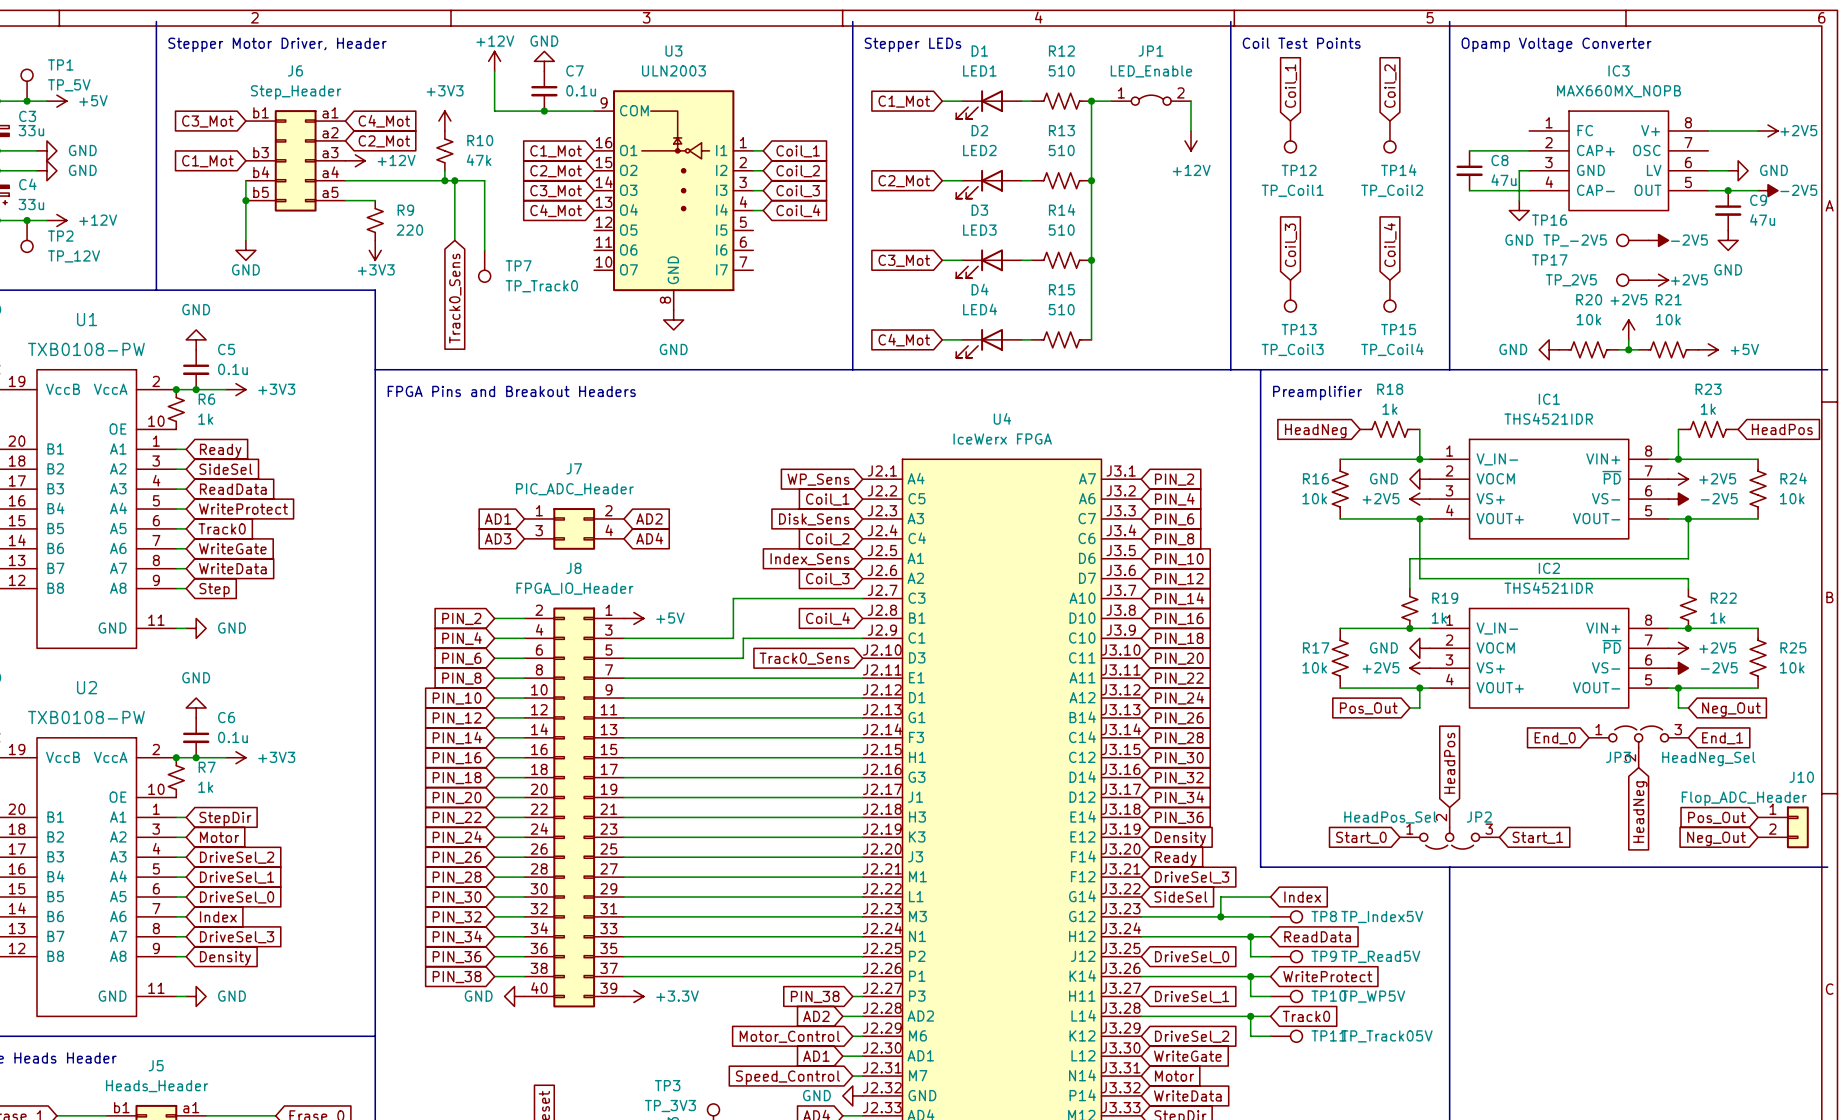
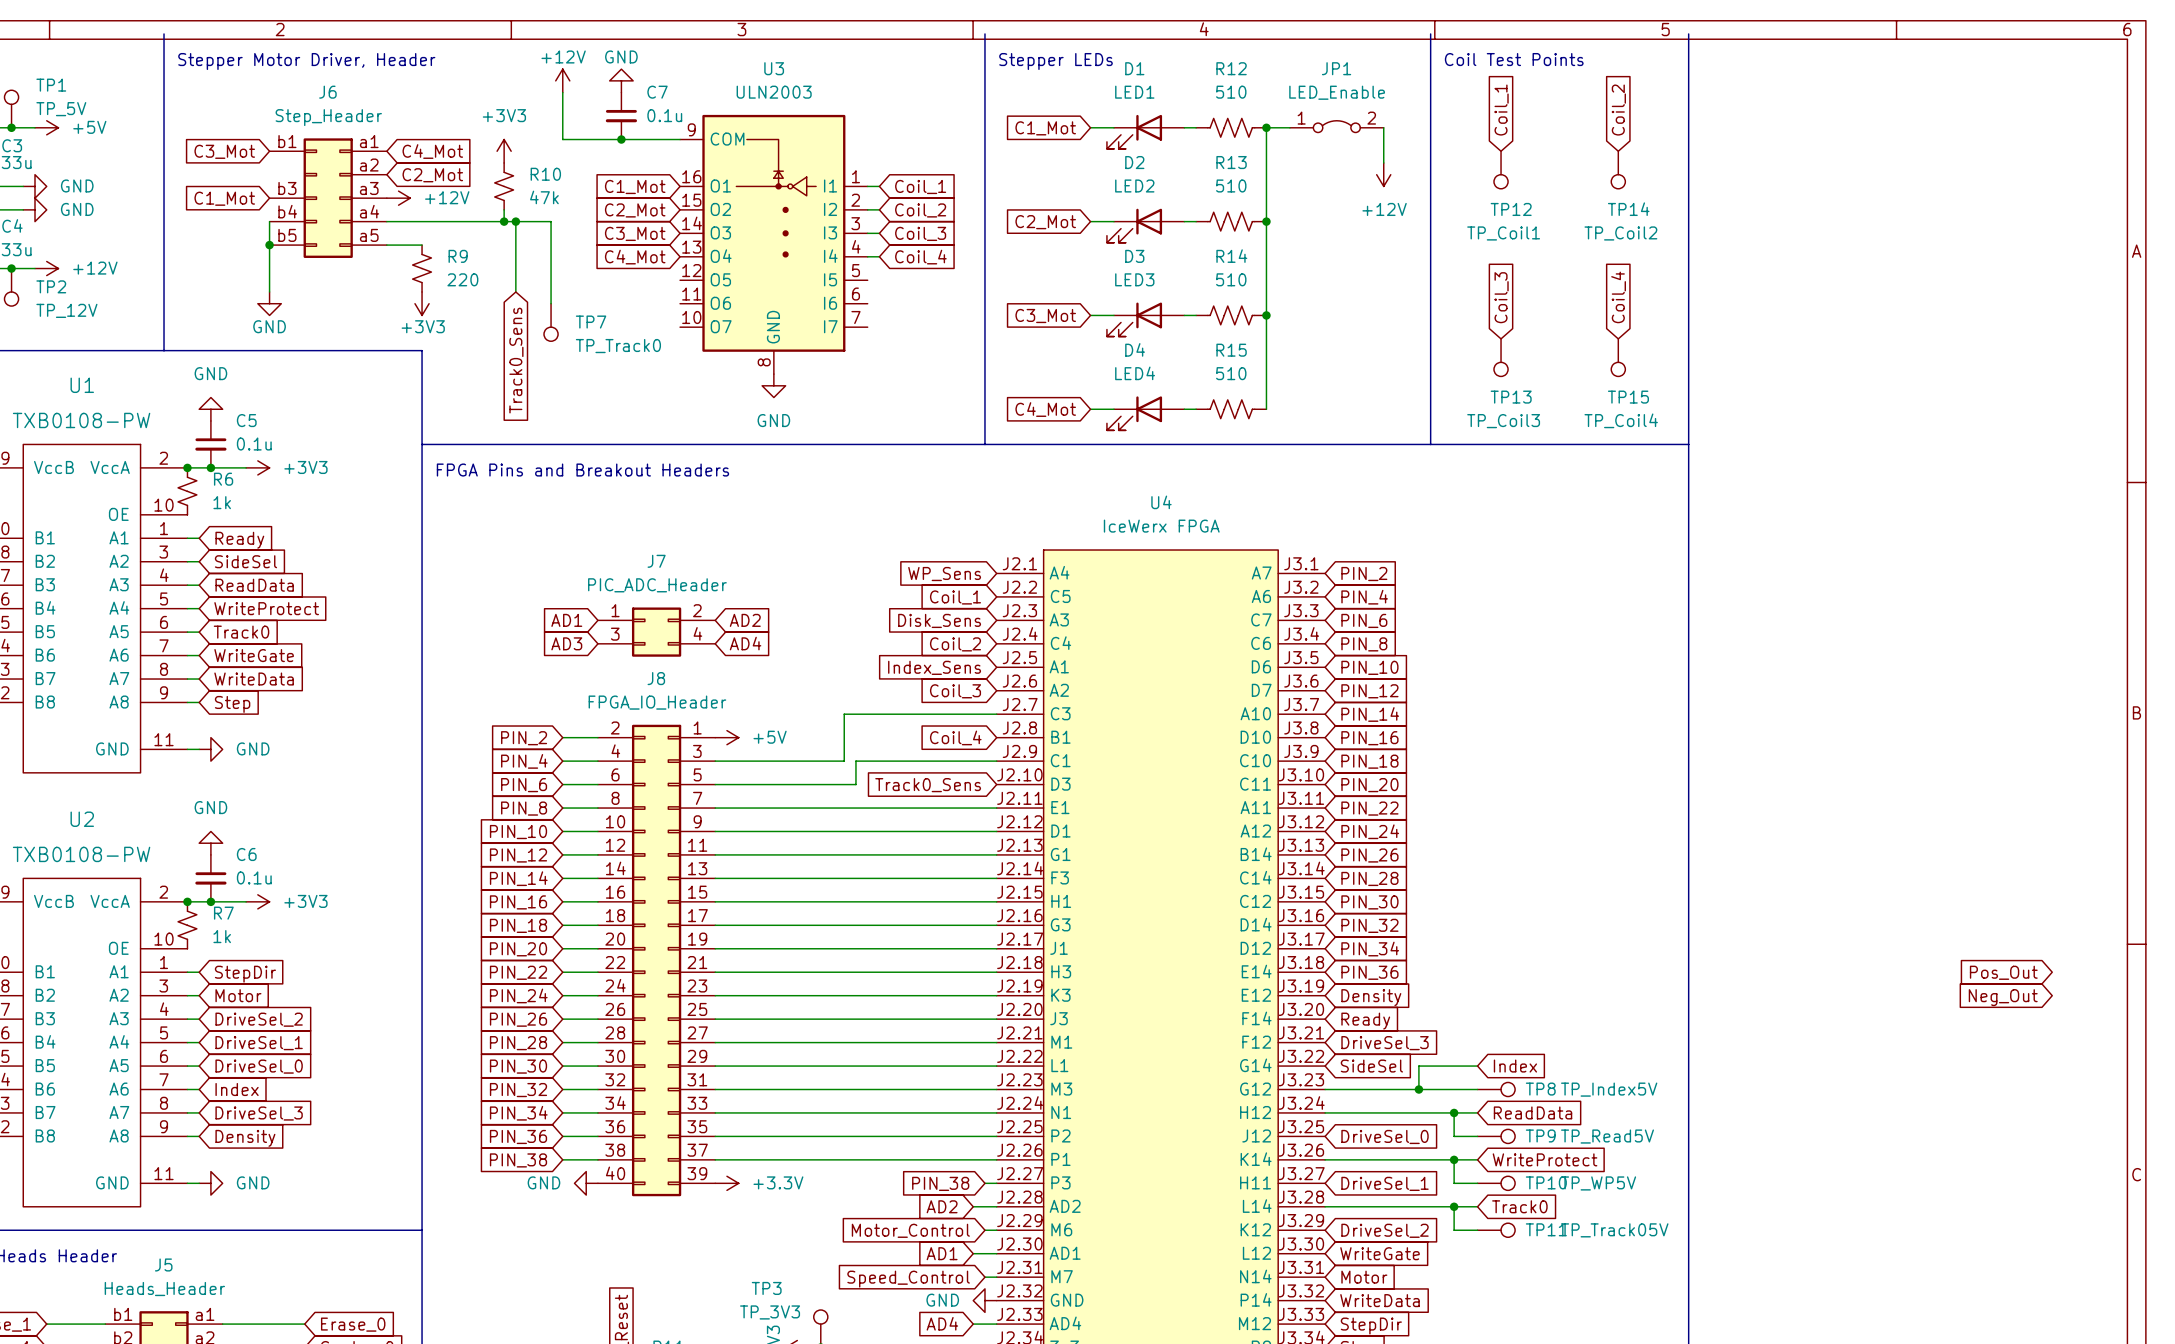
text: Opamp Voltage Converter (1556, 44) -> none
wire: (1708, 130) (1758, 130) -> none
power symbol: +2V5 (1768, 130) -> none
wire: (1469, 150) (1529, 150) -> none
IC3: MAX660MX_NOPB (1618, 160) -> none
C8: 47u (1469, 170) -> none
wire: (1529, 170) (1519, 170) (1519, 200) -> none
wire: (1708, 170) (1728, 170) -> none
power symbol: GND (1738, 170) -> none
wire: (1469, 190) (1529, 190) -> none
wire: (1708, 190) (1758, 190) -> none
junction: (1728, 190) -> none
power symbol: -2V5 (1768, 190) -> none
power symbol: GND (1519, 210) -> none
C9: 47u (1728, 210) -> none
TP16: TP_-2V5 (1632, 240) -> none
power symbol: -2V5 (1658, 240) -> none
power symbol: GND (1728, 240) -> none
TP17: TP_2V5 (1632, 280) -> none
power symbol: +2V5 (1658, 280) -> none
power symbol: +2V5 (1628, 329) -> none
wire: (1628, 339) (1628, 349) -> none
power symbol: GND (1549, 349) -> none
R20: 10k (1588, 349) -> none
wire: (1618, 349) (1638, 349) -> none
junction: (1628, 349) -> none
R21: 10k (1668, 349) -> none
power symbol: +5V (1708, 349) -> none
line: (1260, 369) (1260, 867) (1827, 867) -> none
line: (1449, 369) (1827, 369) -> (1688, 444) (1688, 1030)
text: Preamplifier (1317, 393) -> none
R18: 1k (1389, 429) -> none
wire: (1419, 429) (1419, 459) -> none
wire: (1678, 429) (1678, 459) -> none
R23: 1k (1708, 429) -> none
global label: HeadPos (1782, 429) -> none
global label: HeadNeg (1315, 431) -> none
wire: (1340, 459) (1429, 459) -> none
junction: (1419, 459) -> none
wire: (1668, 459) (1758, 459) -> none
junction: (1678, 459) -> none
power symbol: GND (1419, 479) -> none
power symbol: +2V5 (1678, 479) -> none
R16: 10k (1340, 489) -> none
IC1: THS4521IDR (1549, 489) -> none
R24: 10k (1758, 489) -> none
power symbol: +2V5 (1419, 499) -> none
power symbol: -2V5 (1678, 499) -> none
wire: (1340, 518) (1429, 518) -> none
wire: (1419, 518) (1419, 578) (1688, 578) (1688, 588) -> none
junction: (1419, 518) -> none
wire: (1668, 518) (1758, 518) -> none
wire: (1688, 518) (1688, 558) (1409, 558) (1409, 588) -> none
junction: (1688, 518) -> none
R19: 1k (1409, 608) -> none
R22: 1k (1688, 608) -> none
wire: (1340, 628) (1429, 628) -> none
junction: (1409, 628) -> none
wire: (1668, 628) (1758, 628) -> none
junction: (1688, 628) -> none
power symbol: GND (1419, 648) -> none
power symbol: +2V5 (1678, 648) -> none
R17: 10k (1340, 658) -> none
IC2: THS4521IDR (1549, 658) -> none
R25: 10k (1758, 658) -> none
power symbol: +2V5 (1419, 668) -> none
power symbol: -2V5 (1678, 668) -> none
wire: (1340, 688) (1429, 688) -> none
wire: (1419, 688) (1419, 707) (1409, 707) -> none
junction: (1419, 688) -> none
wire: (1668, 688) (1758, 688) -> none
wire: (1678, 688) (1678, 707) (1688, 707) -> none
junction: (1678, 688) -> none
global label: Pos_Out (1368, 708) -> none
global label: Neg_Out (1731, 709) -> none
global label: End_0 (1555, 738) -> none
global label: End_1 (1722, 738) -> none
JP3: HeadNeg_Sel (1638, 746) -> none
global label: HeadPos (1449, 763) -> none
global label: HeadNeg (1640, 812) -> none
J10: Flop_ADC_Header (1783, 827) -> none
JP2: HeadPos_Sel (1449, 828) -> none
global label: Start_0 (1361, 837) -> none
global label: Start_1 (1537, 837) -> none

